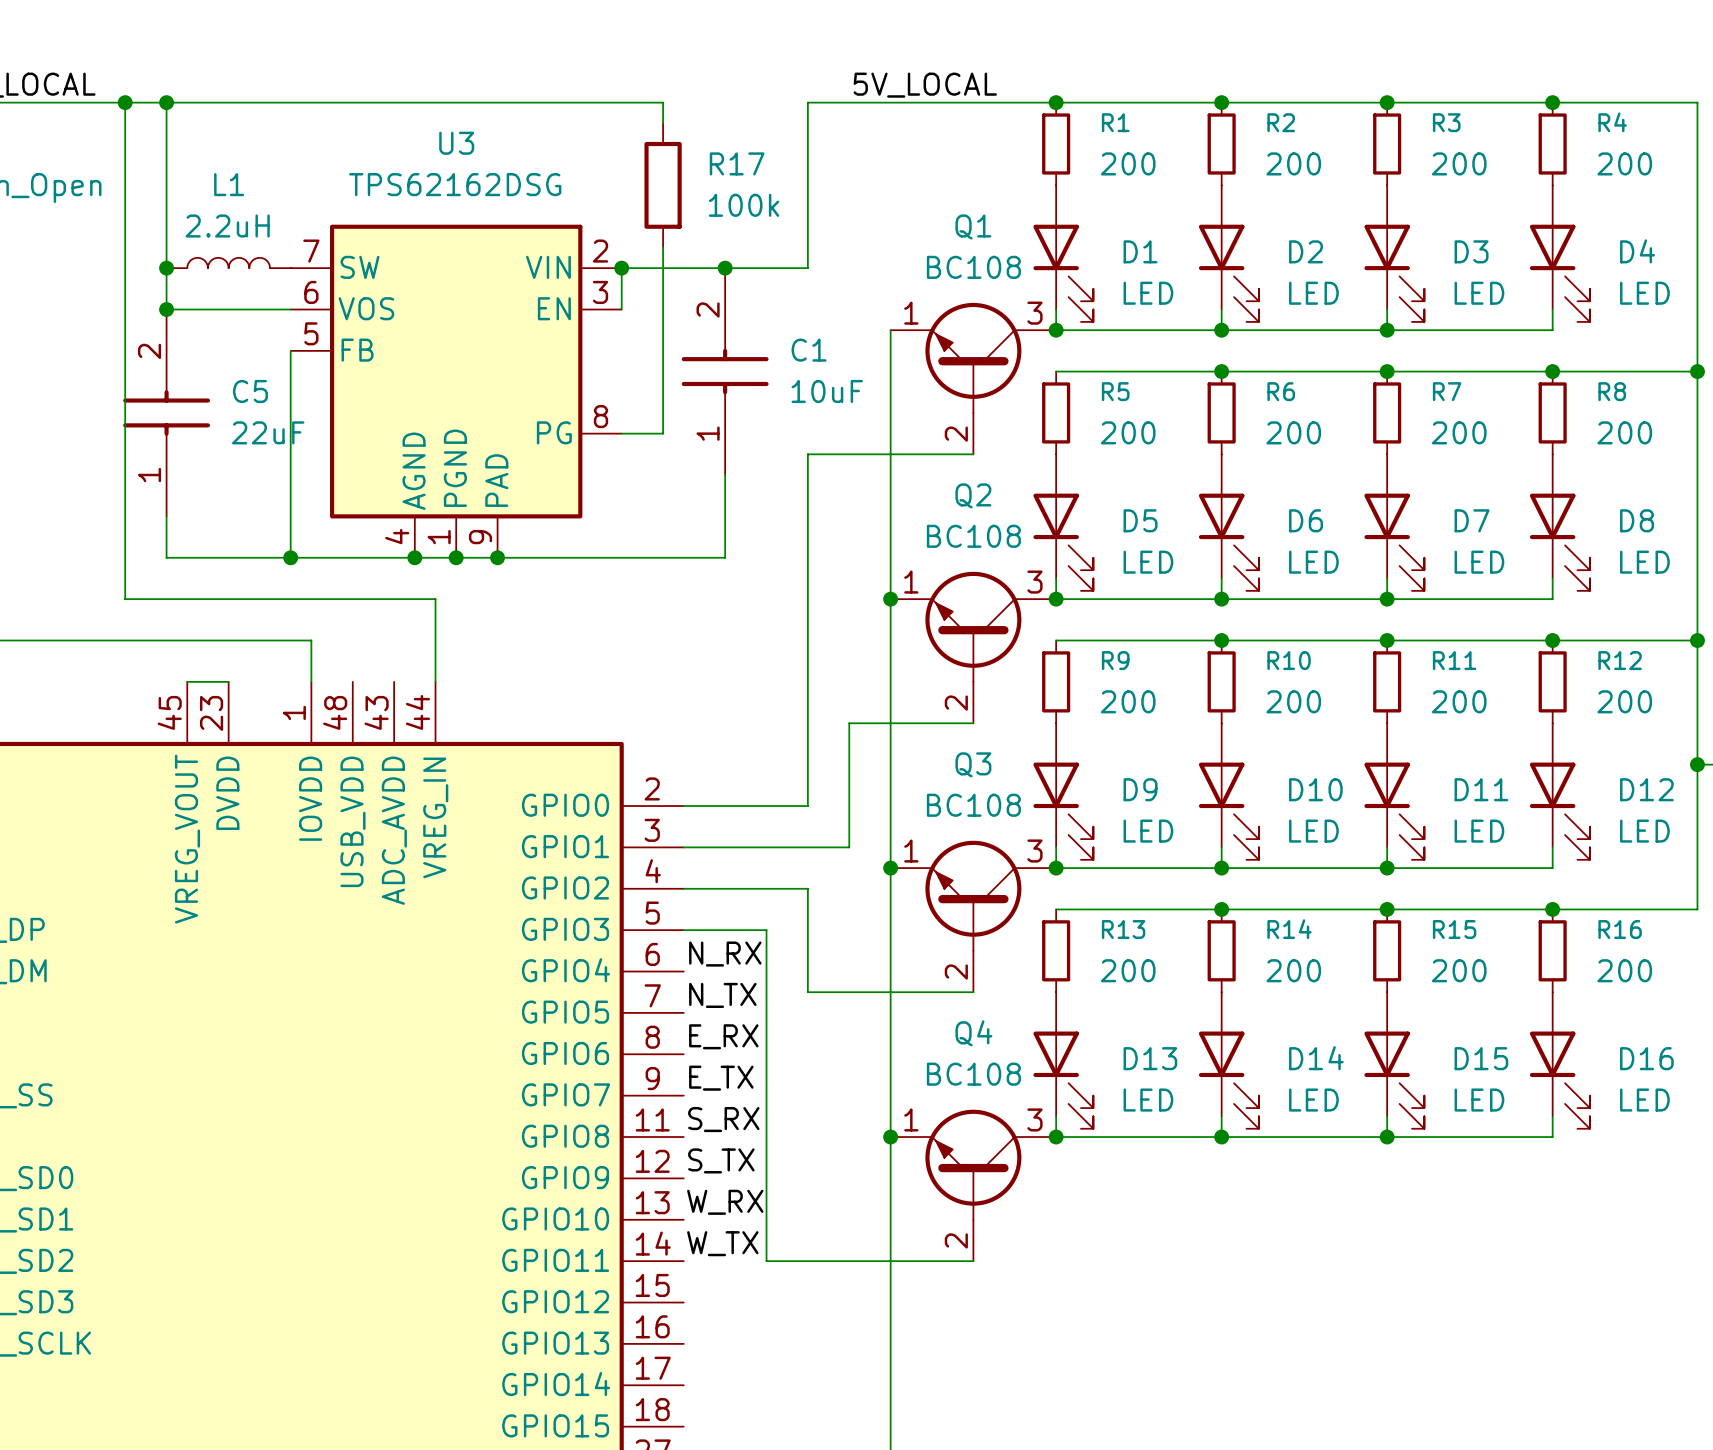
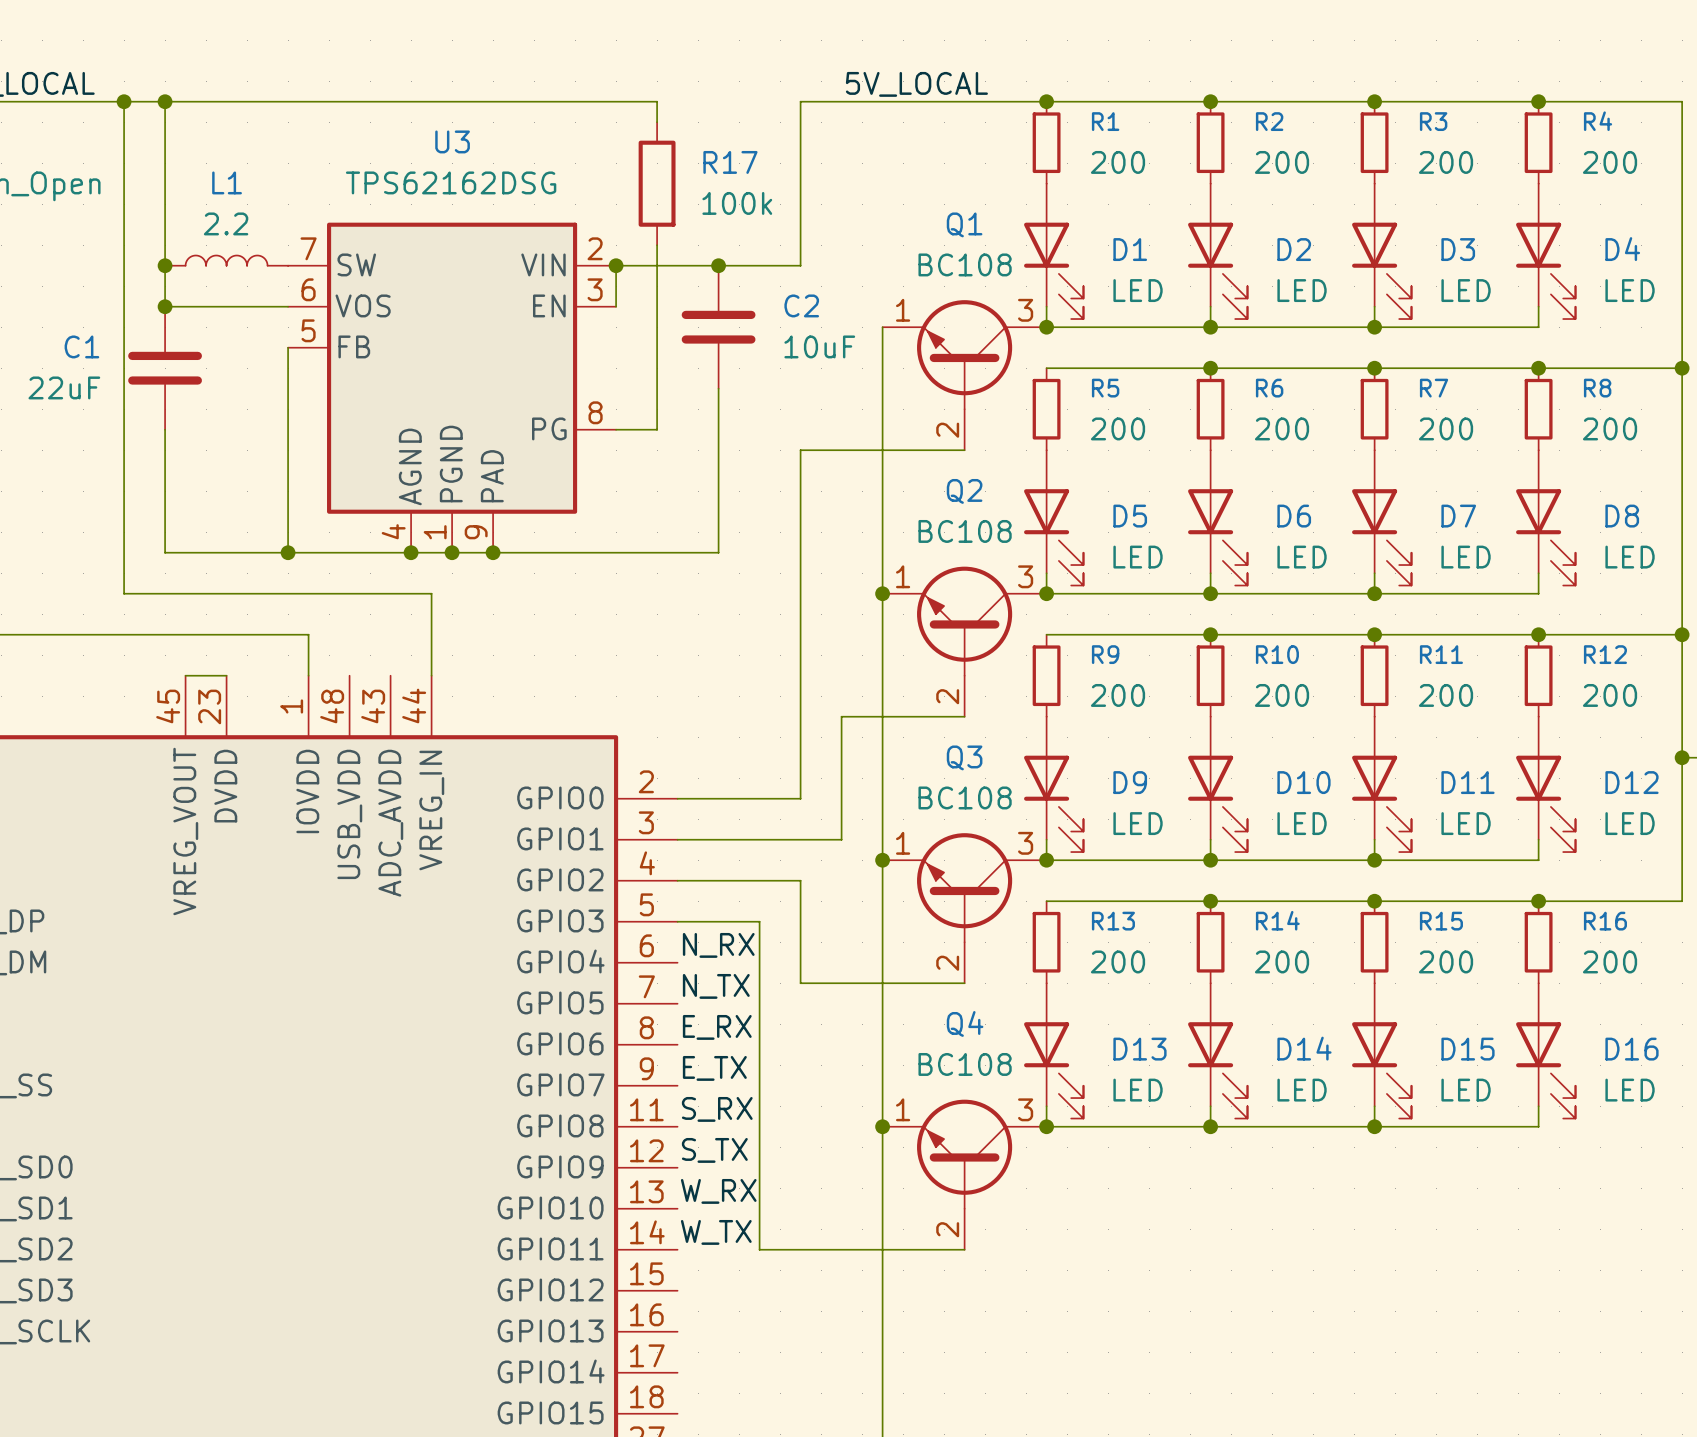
L1 value: 2.2uH (227, 225) -> 2.2 (226, 223)
C1 symbol: [681, 268, 769, 476] -> [128, 306, 202, 430]
C2: none -> 10uF (718, 327)
C1 name position: C1 (809, 350) -> C1 (81, 346)
C1 value: 10uF (827, 391) -> 22uF (64, 387)
C5: 22uF (166, 412) -> none

